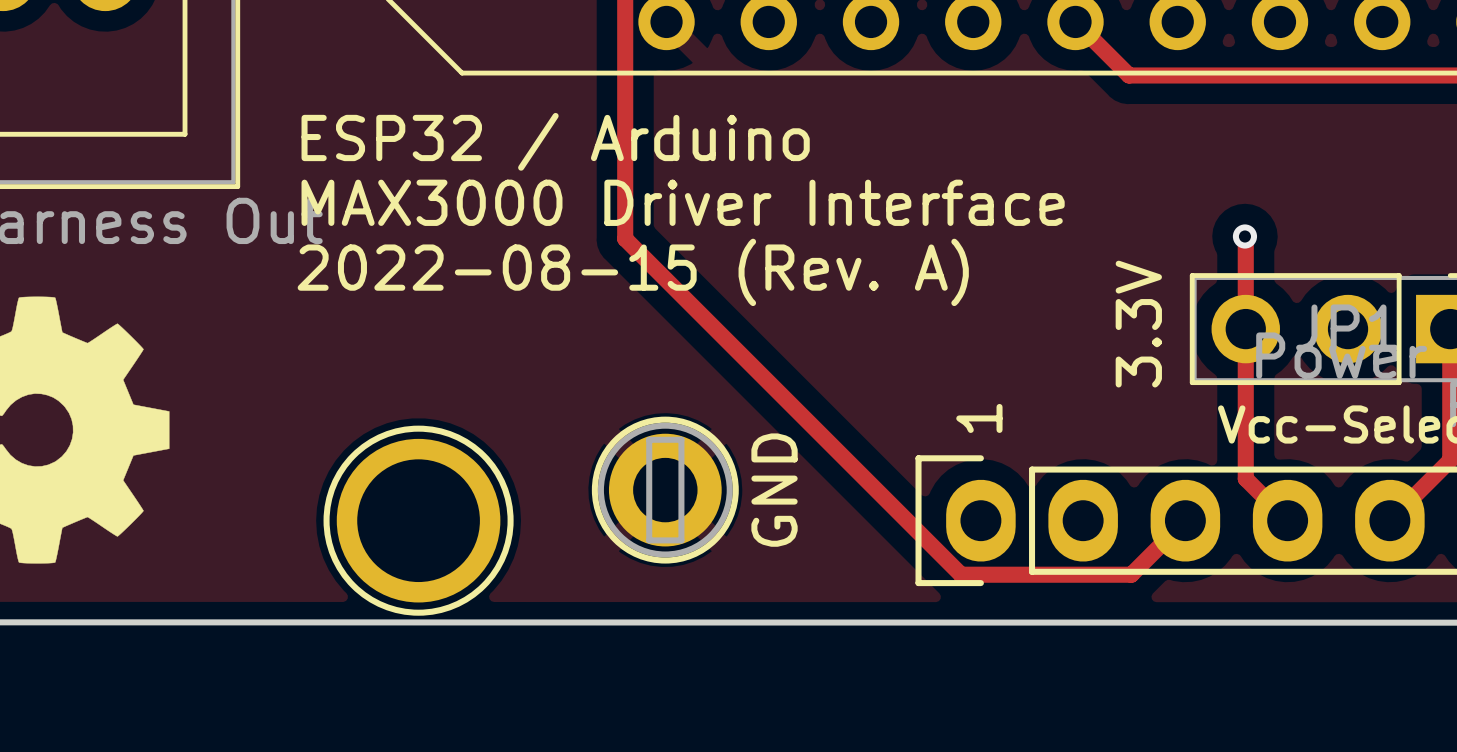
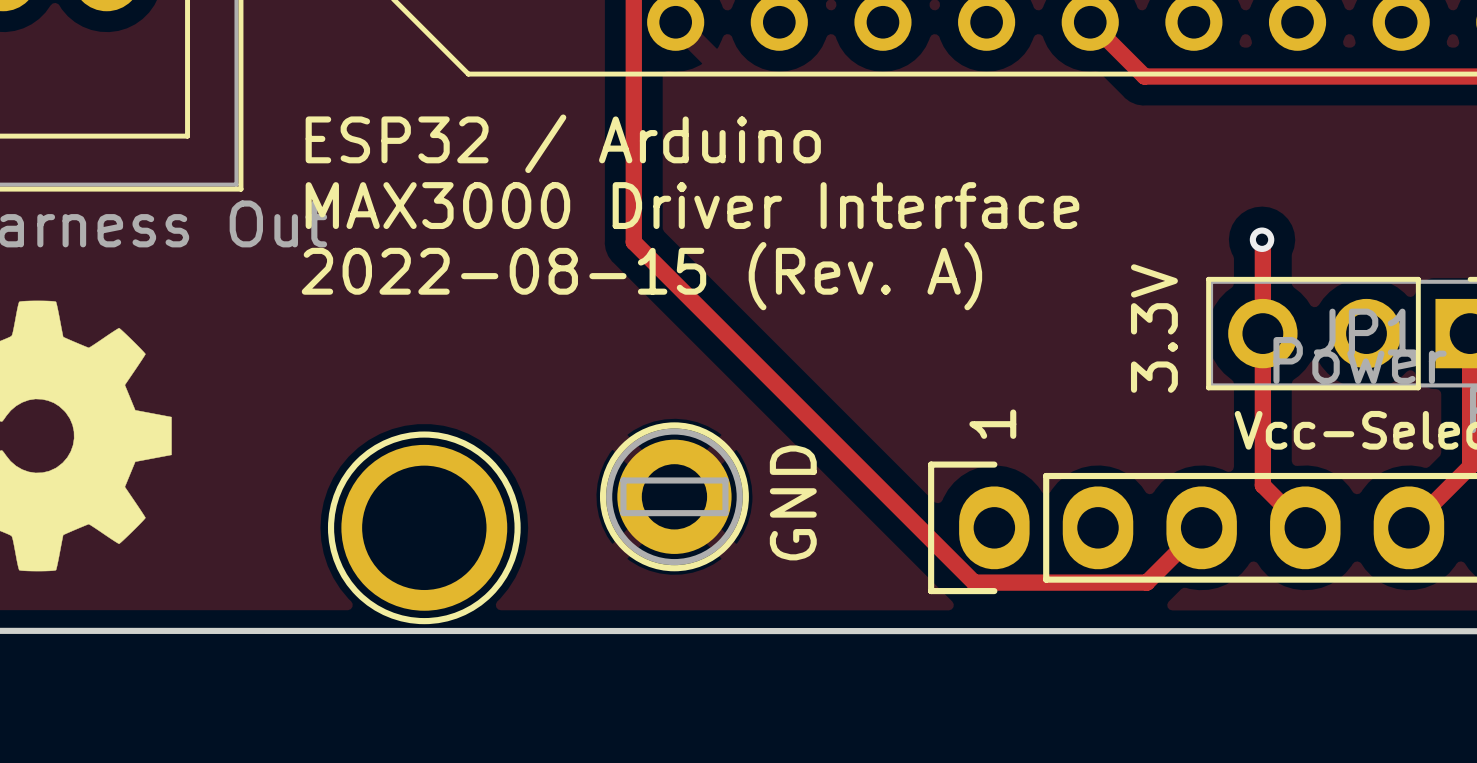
part rotation: 0° (665, 490) -> 90° clockwise (674, 496)

